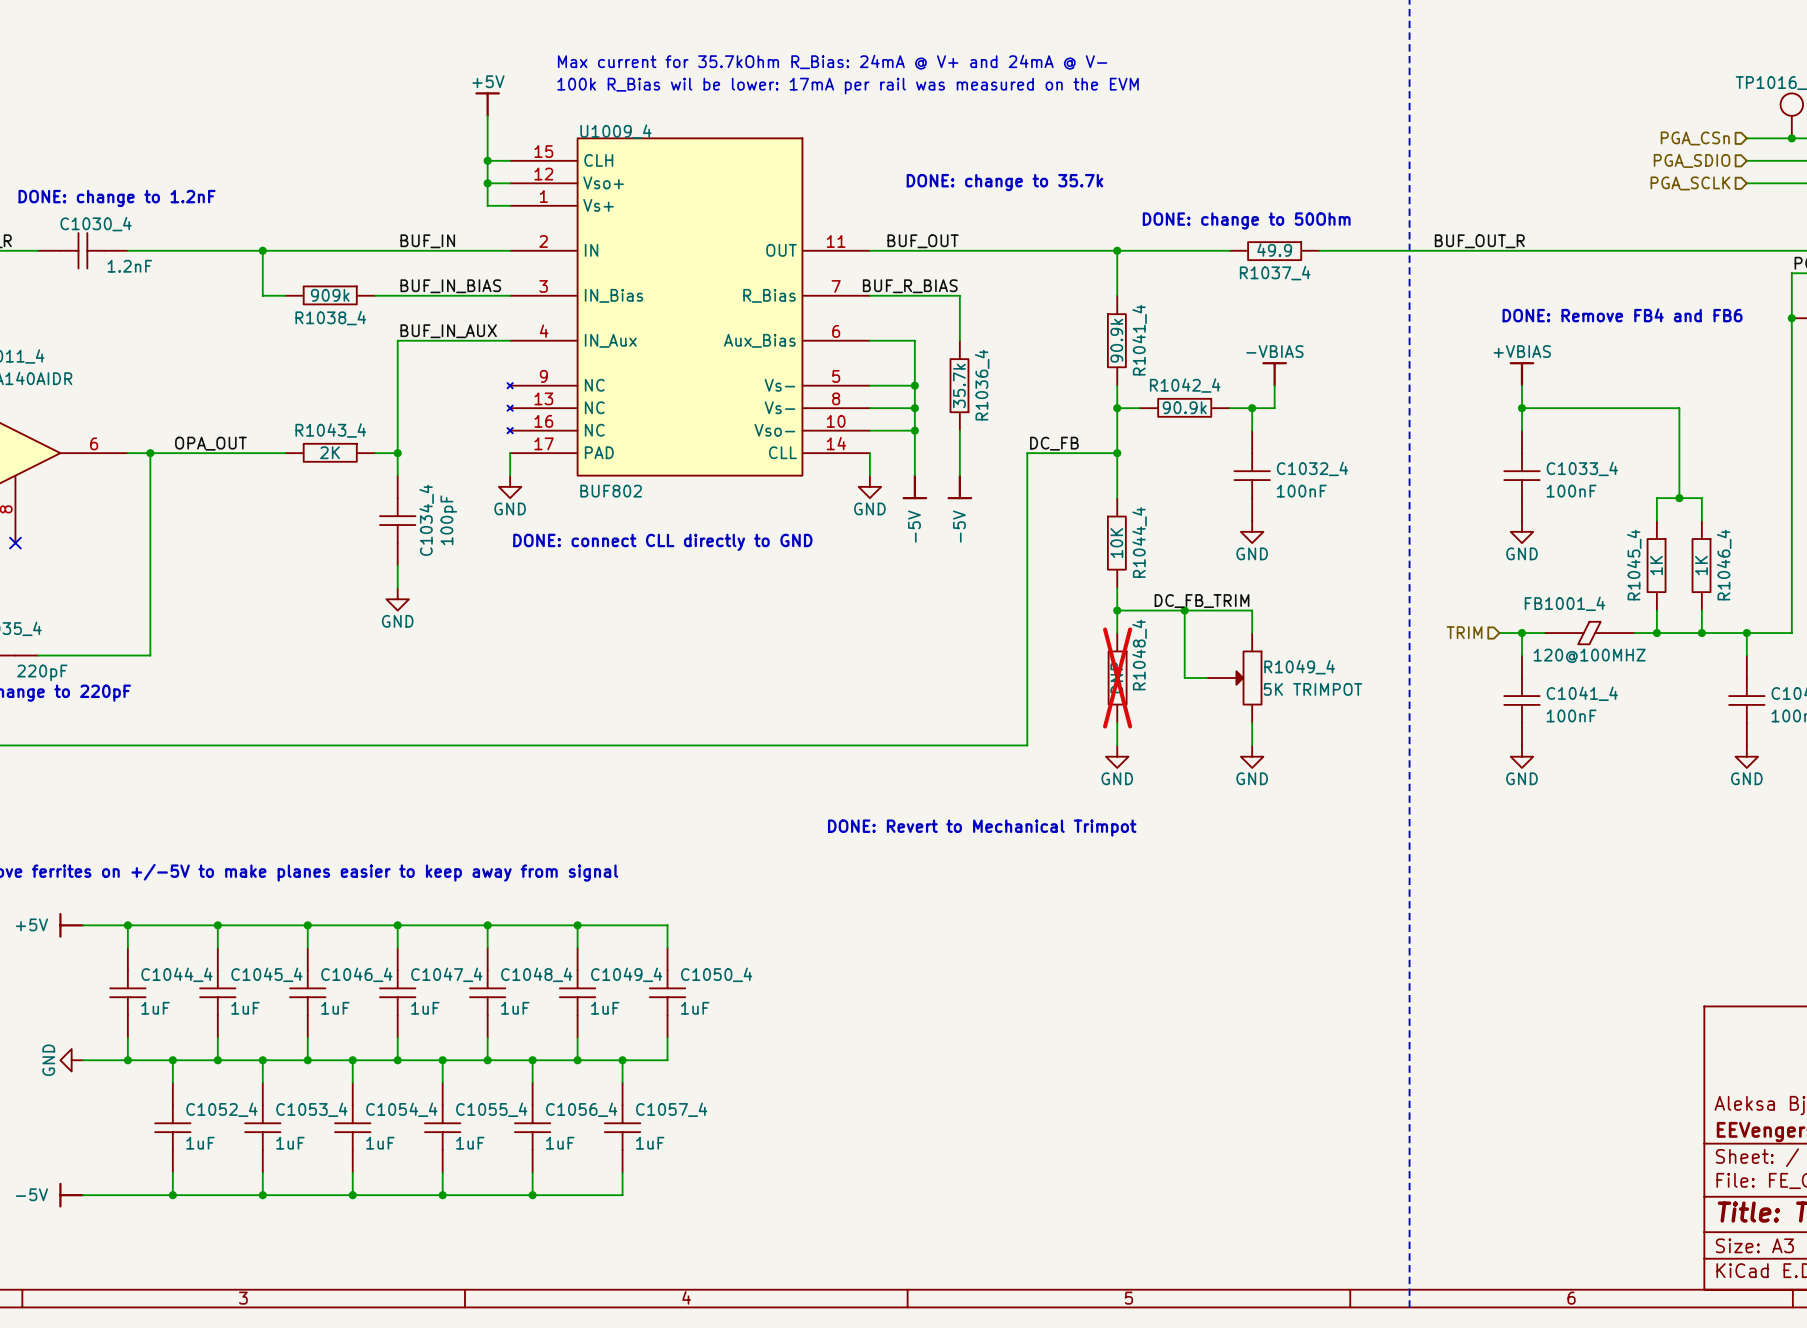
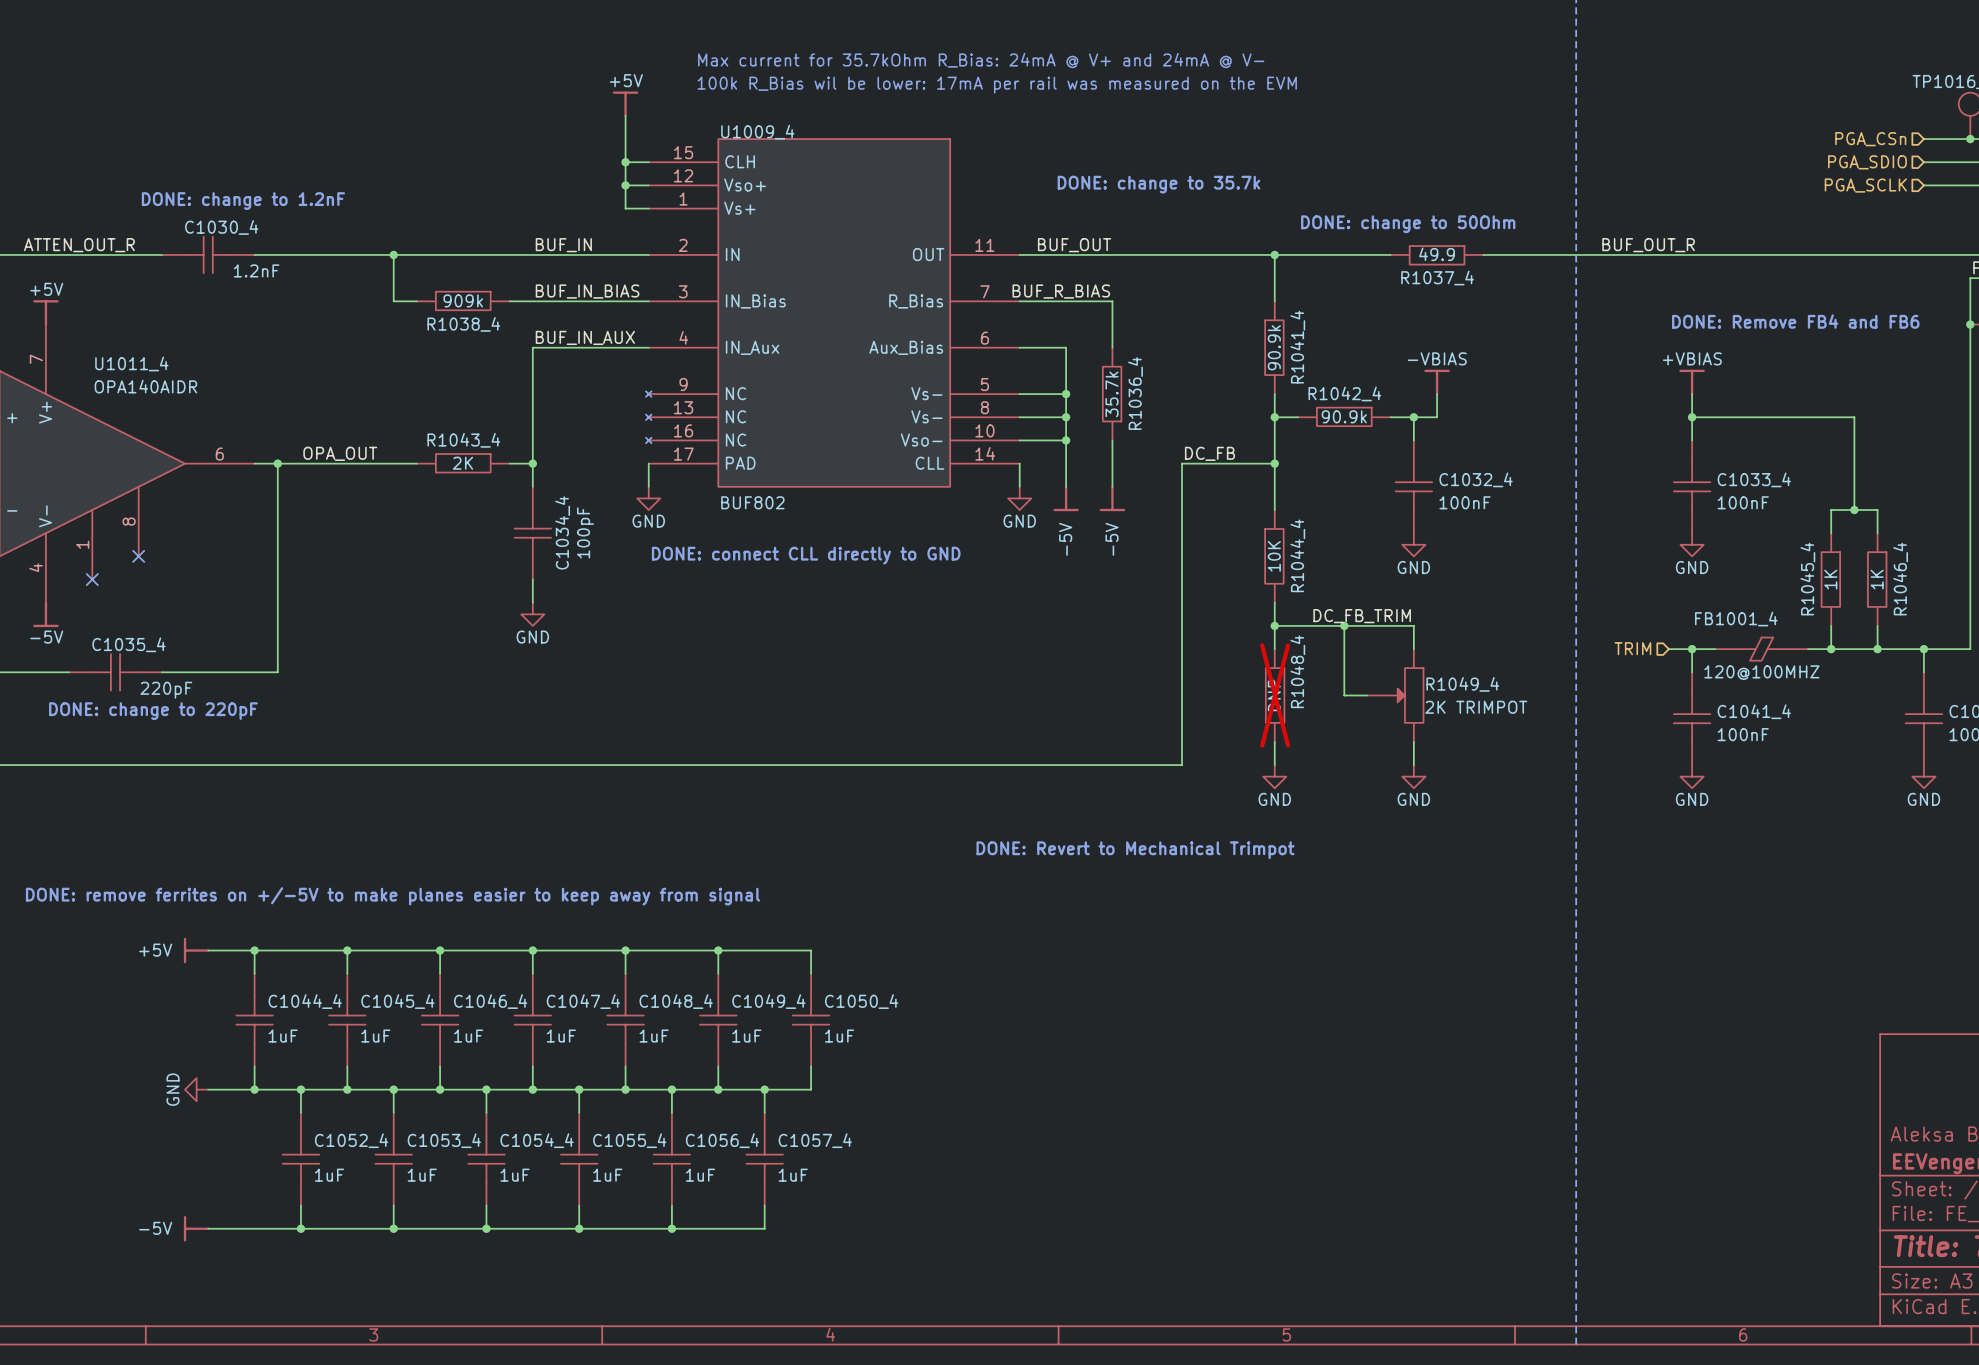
R1049_4 value: 5K TRIMPOT (1312, 689) -> 2K TRIMPOT (1476, 707)

